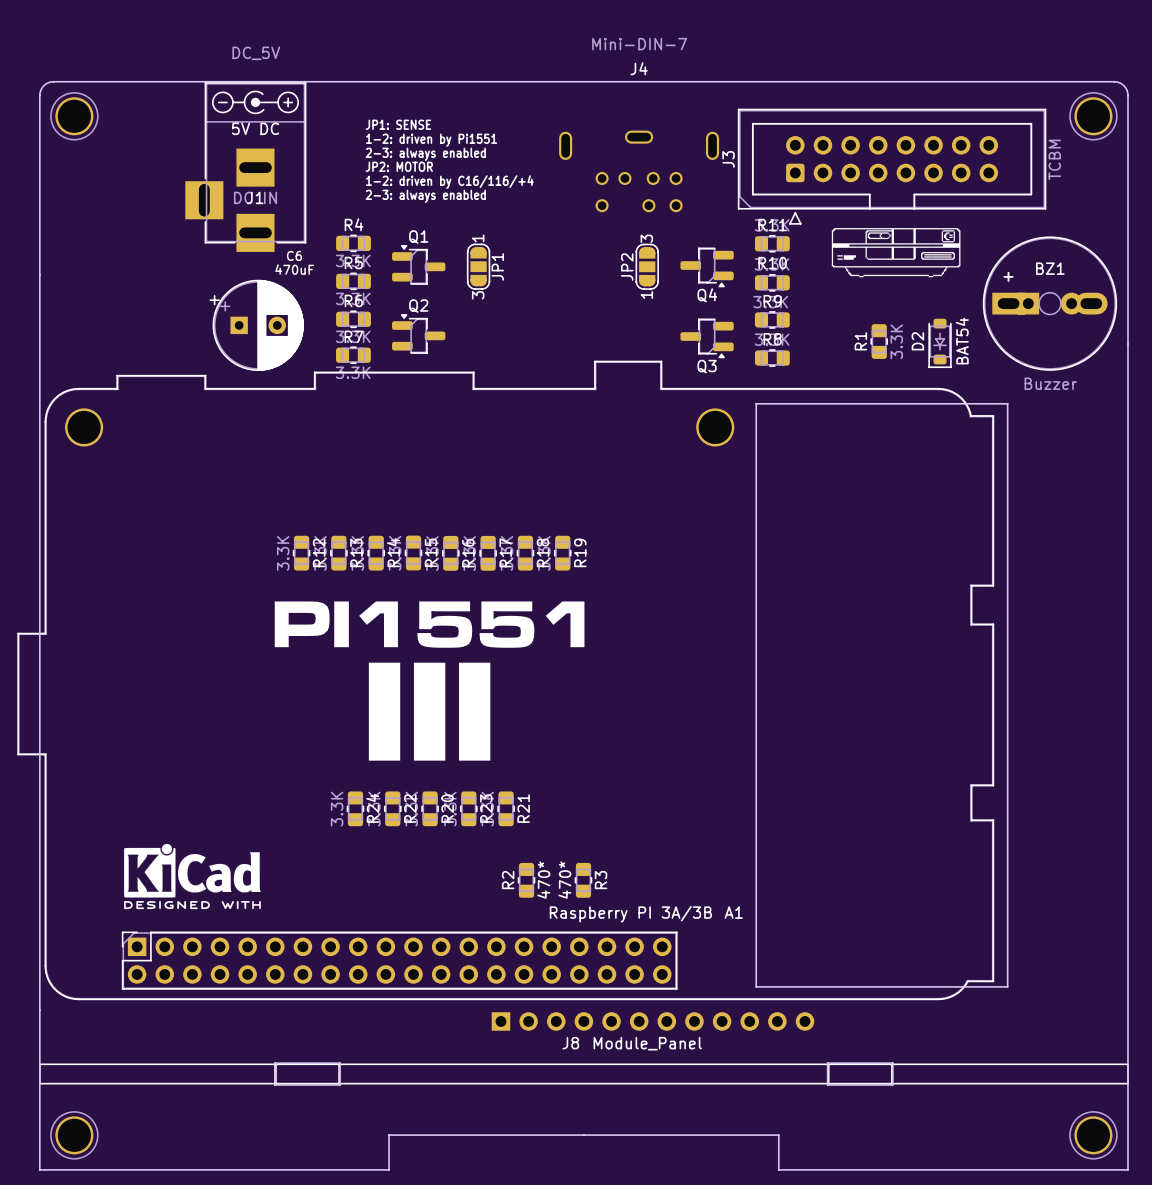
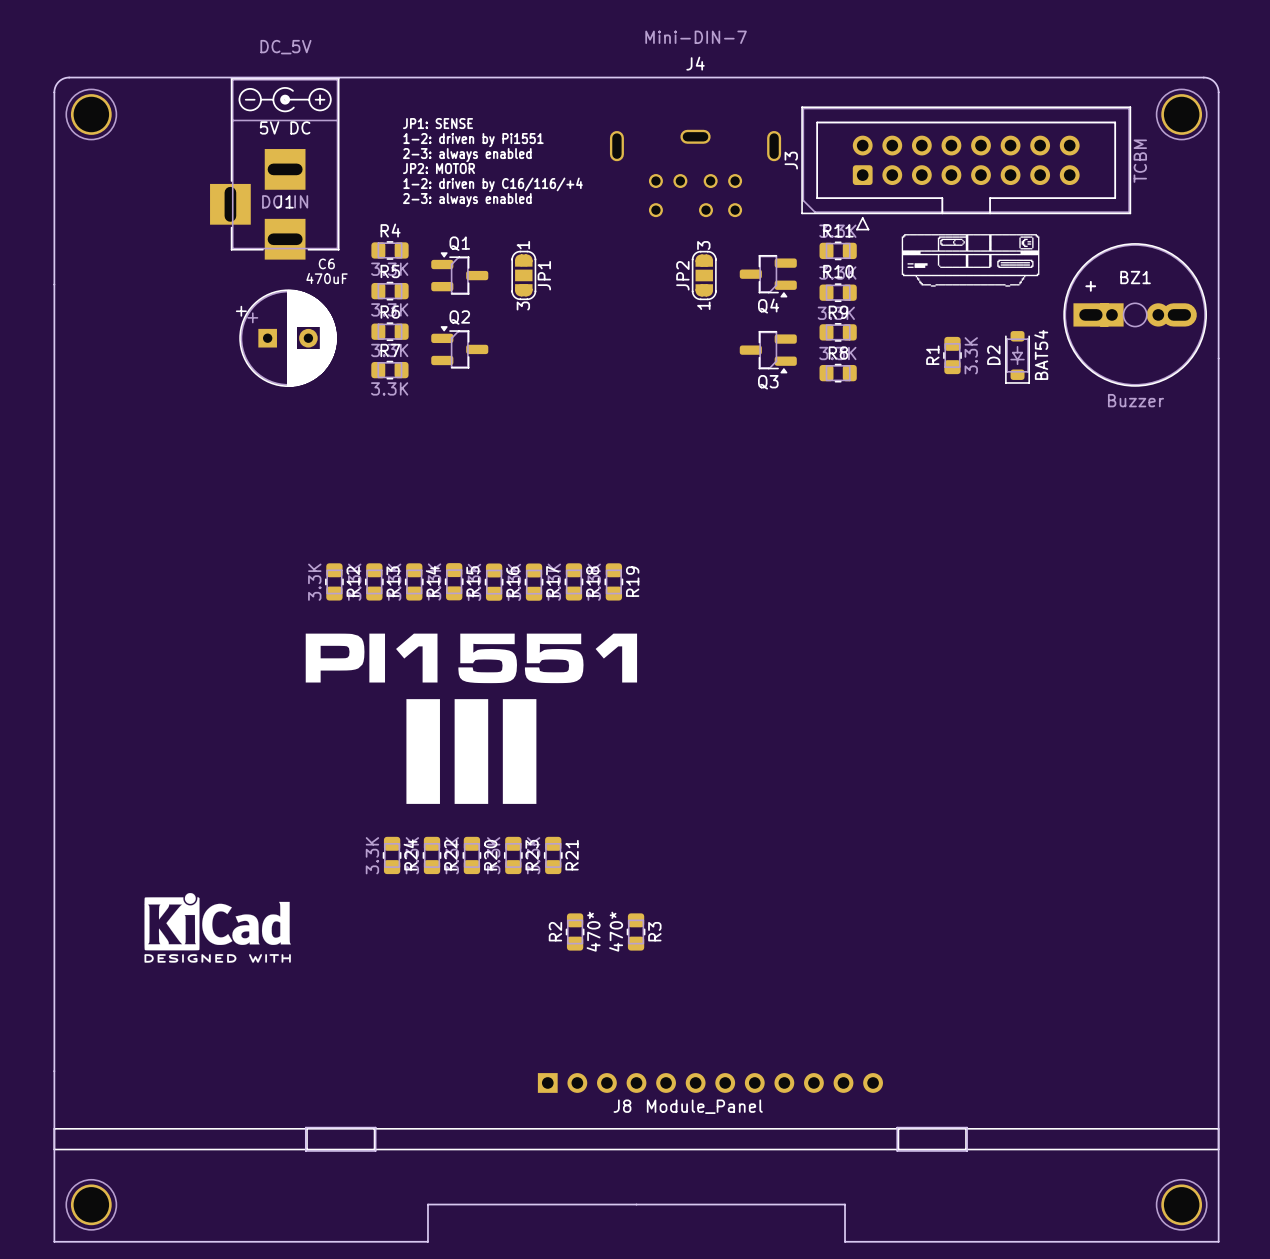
board edge: (756, 403) (756, 986) (1007, 986) (1007, 403) (756, 403) -> none
A1: Raspberry PI 3A/3B (505, 680) -> none

